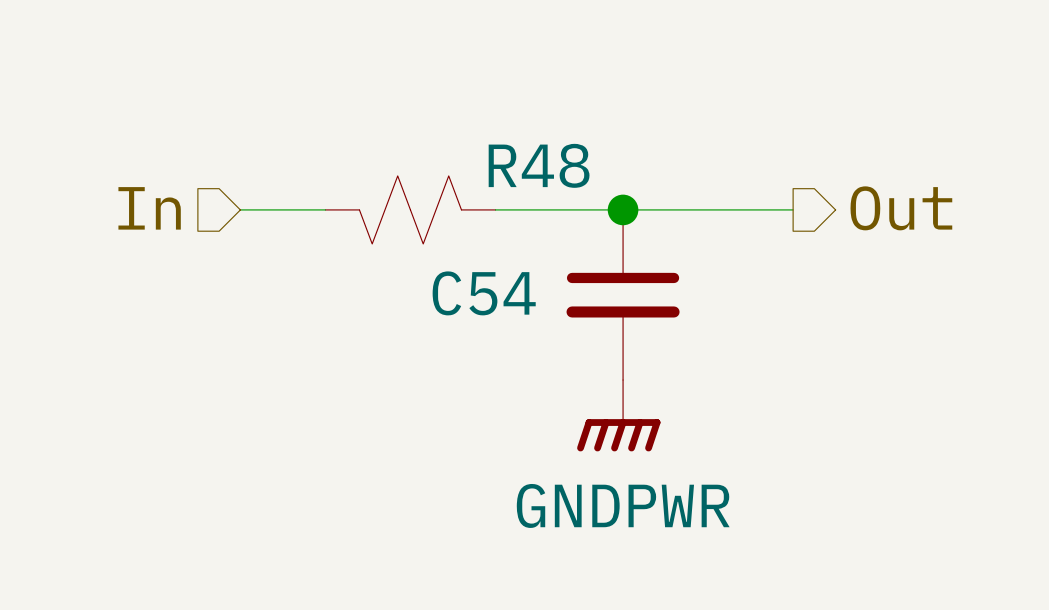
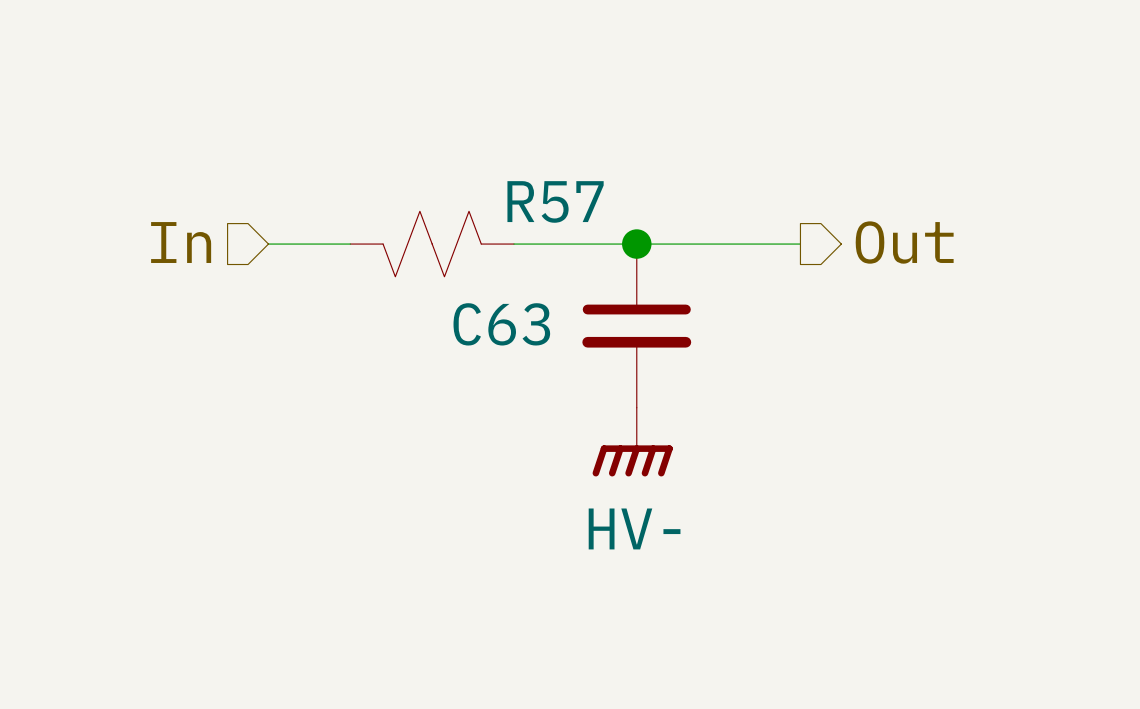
R48 name: R48 (539, 165) -> R57 (555, 201)
C54 name: C54 (484, 293) -> C63 (501, 324)
power symbol: GNDPWR (618, 415) -> HV- (632, 442)

